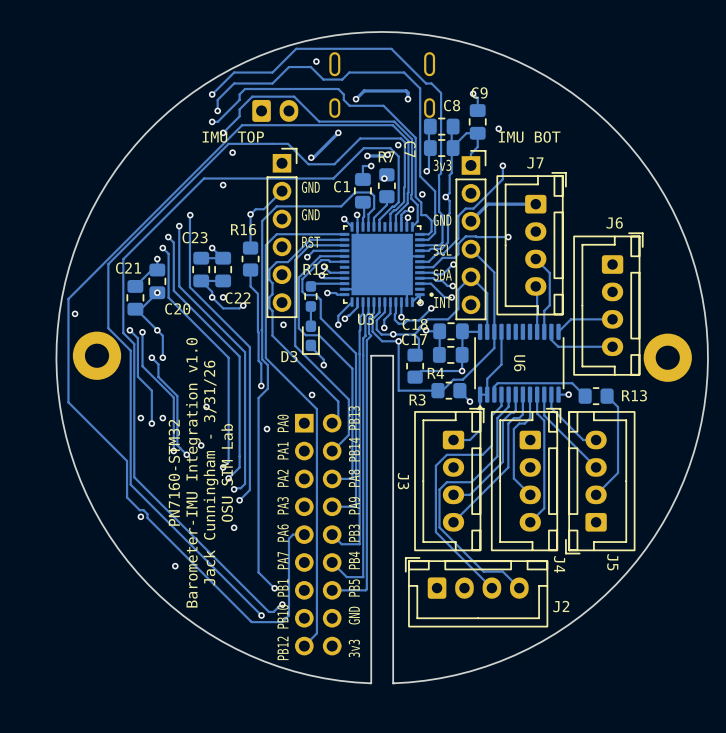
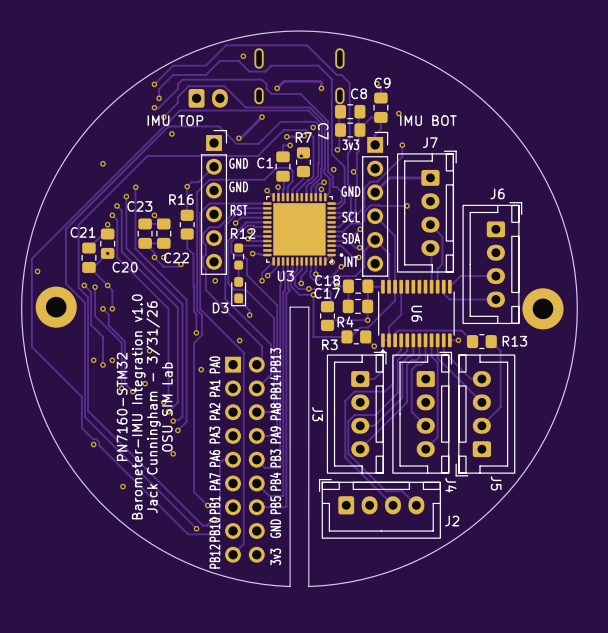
via: (223, 185) -> none
via: none -> (103, 163)

